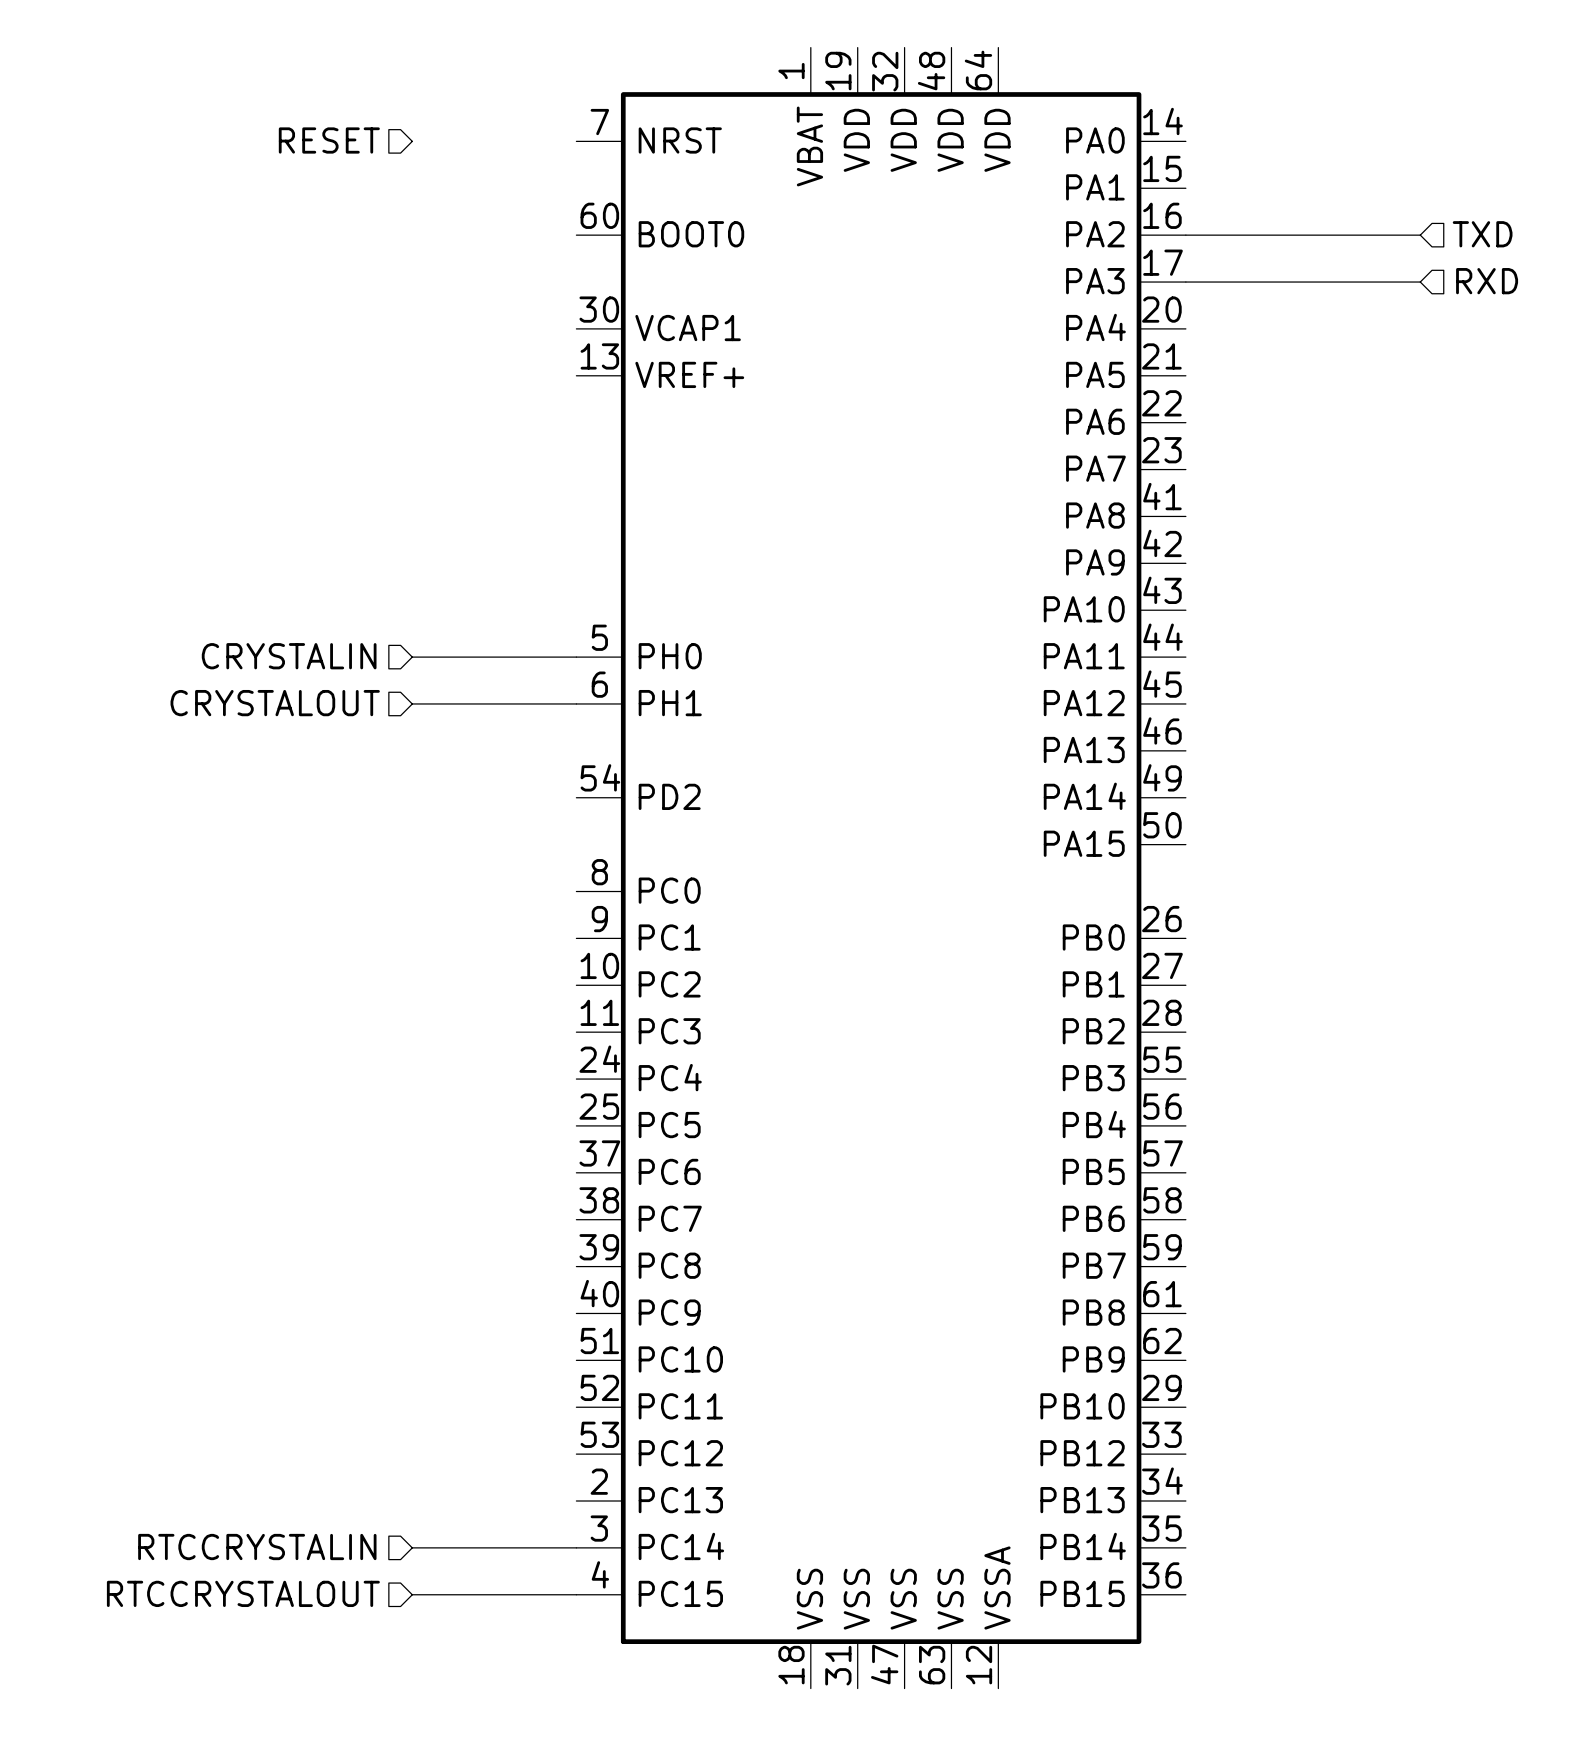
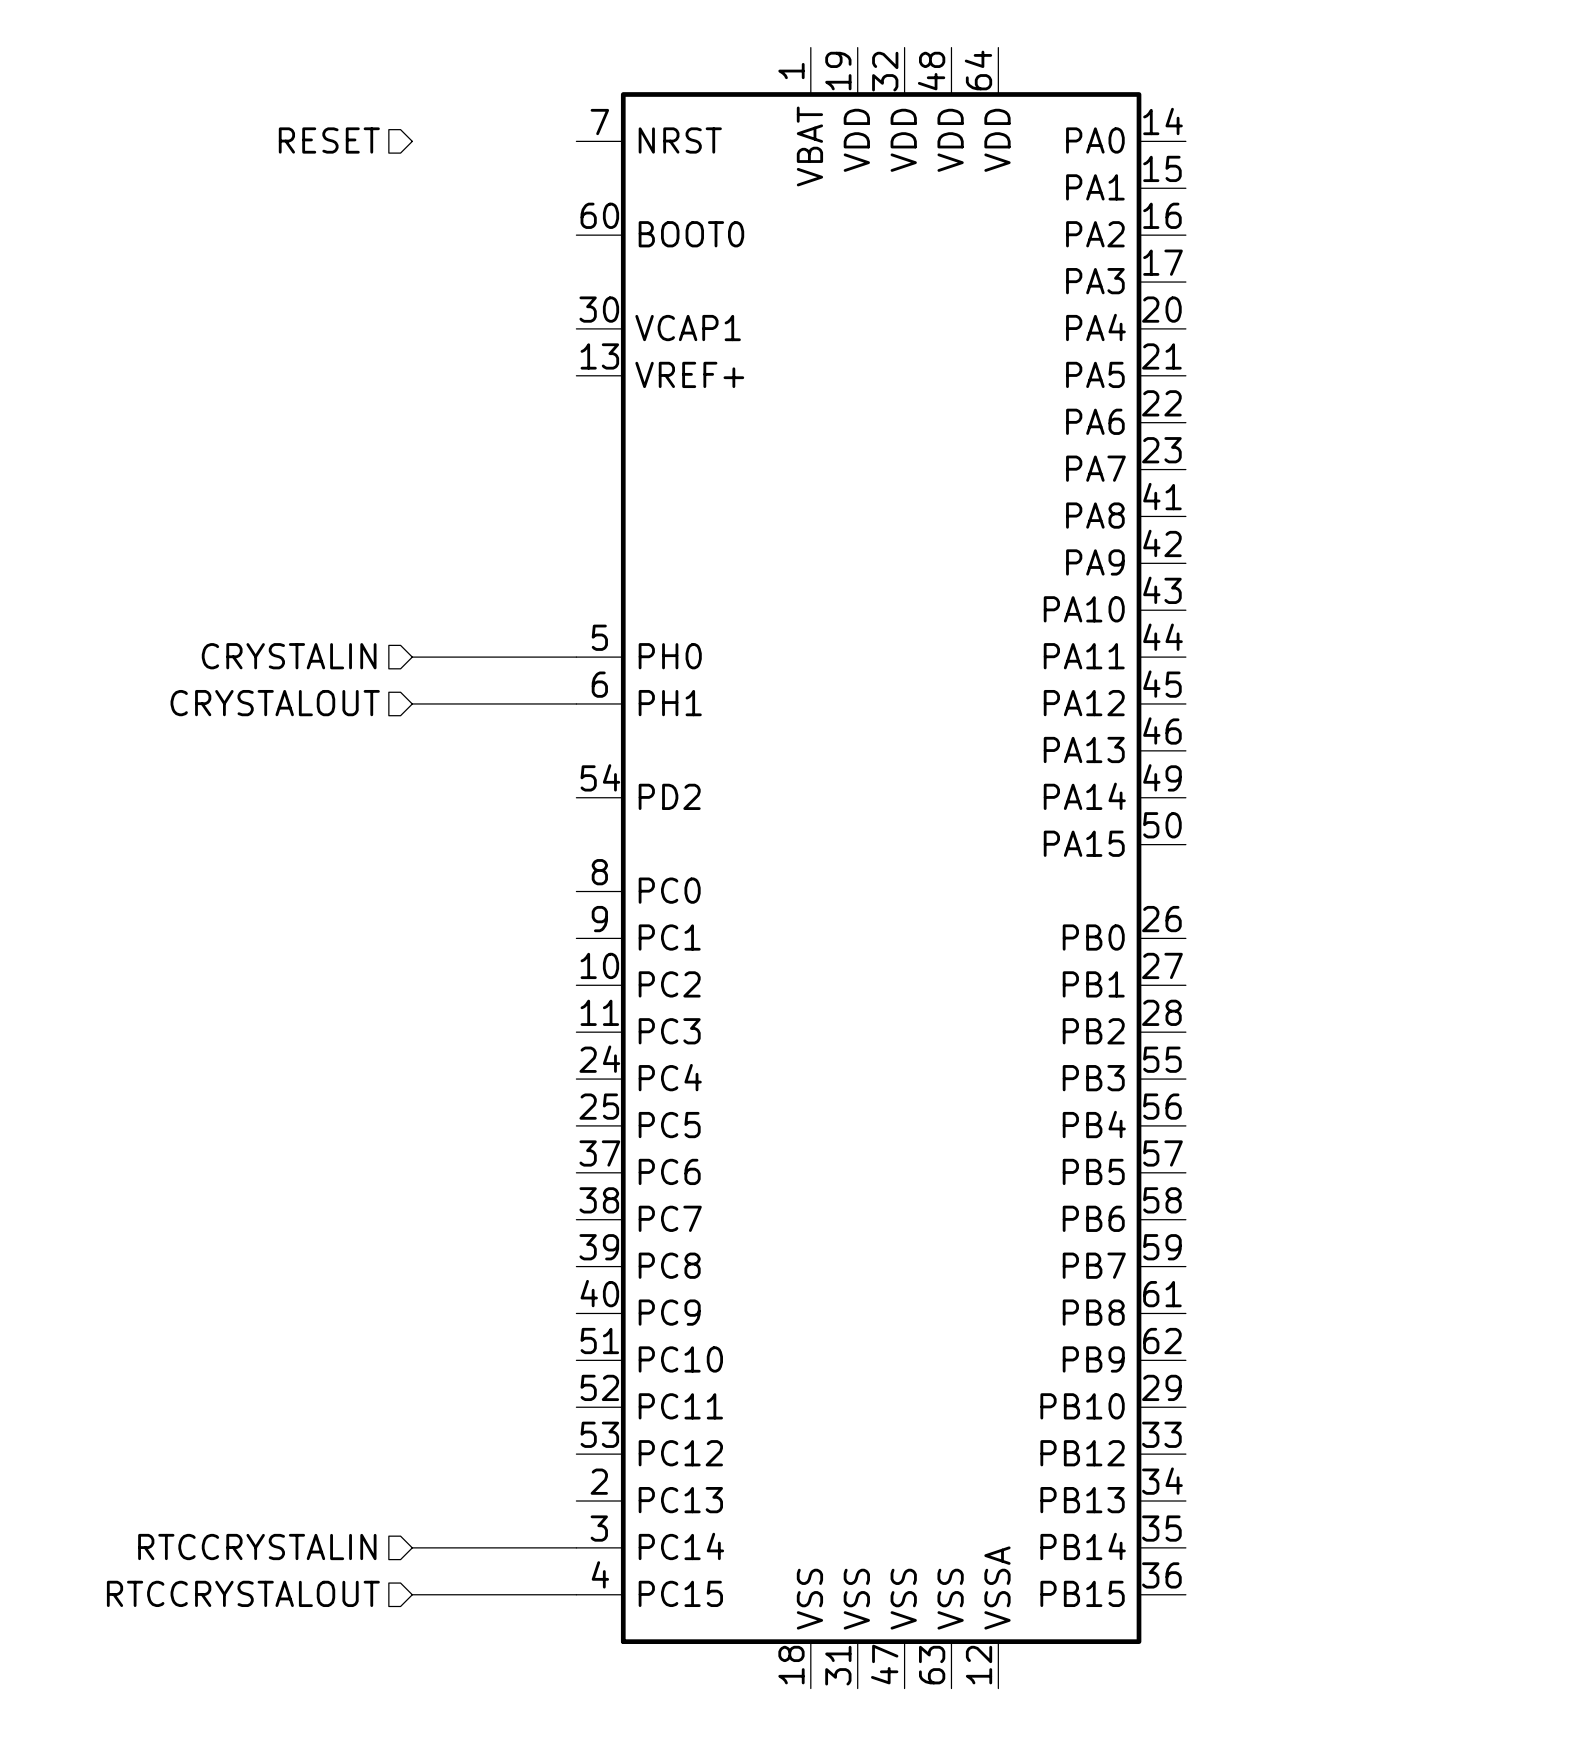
hierarchical label: TXD (1482, 234) -> none
wire: (1185, 235) (1420, 235) -> none
hierarchical label: RXD (1487, 281) -> none
wire: (1185, 282) (1420, 282) -> none

